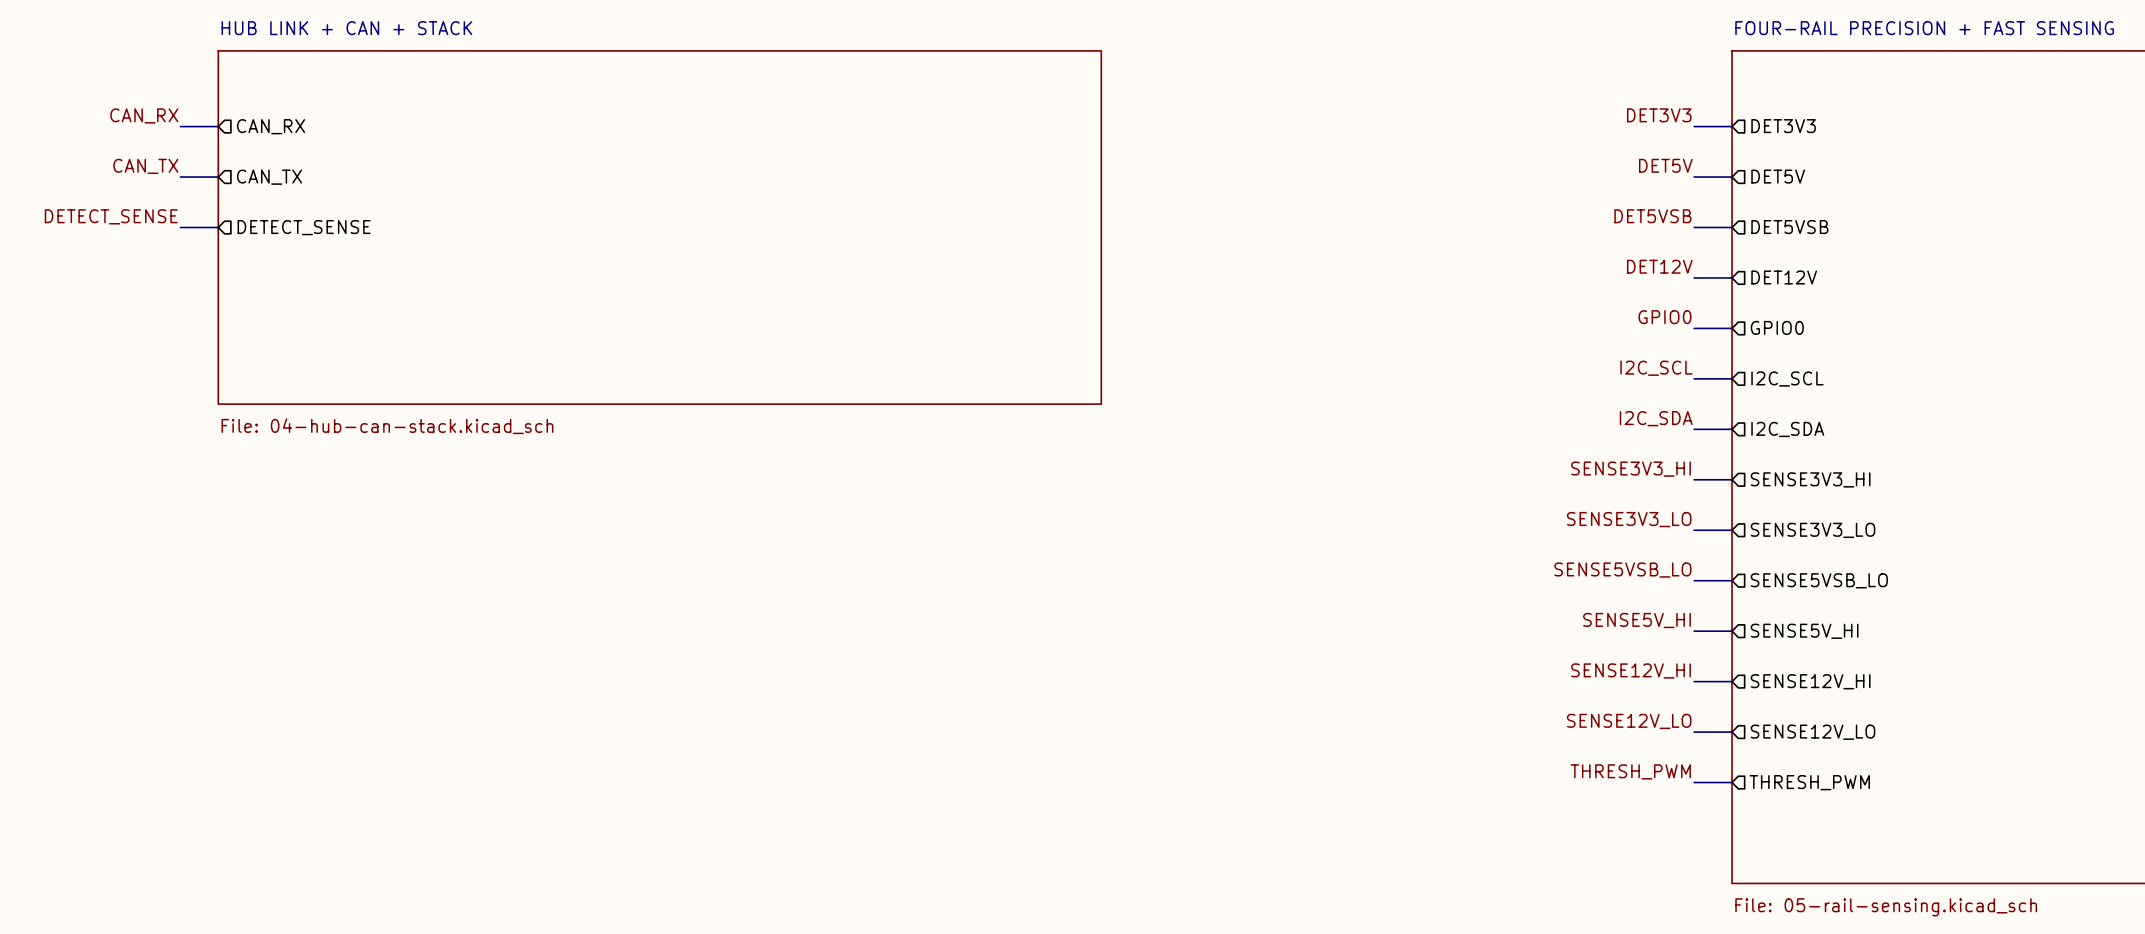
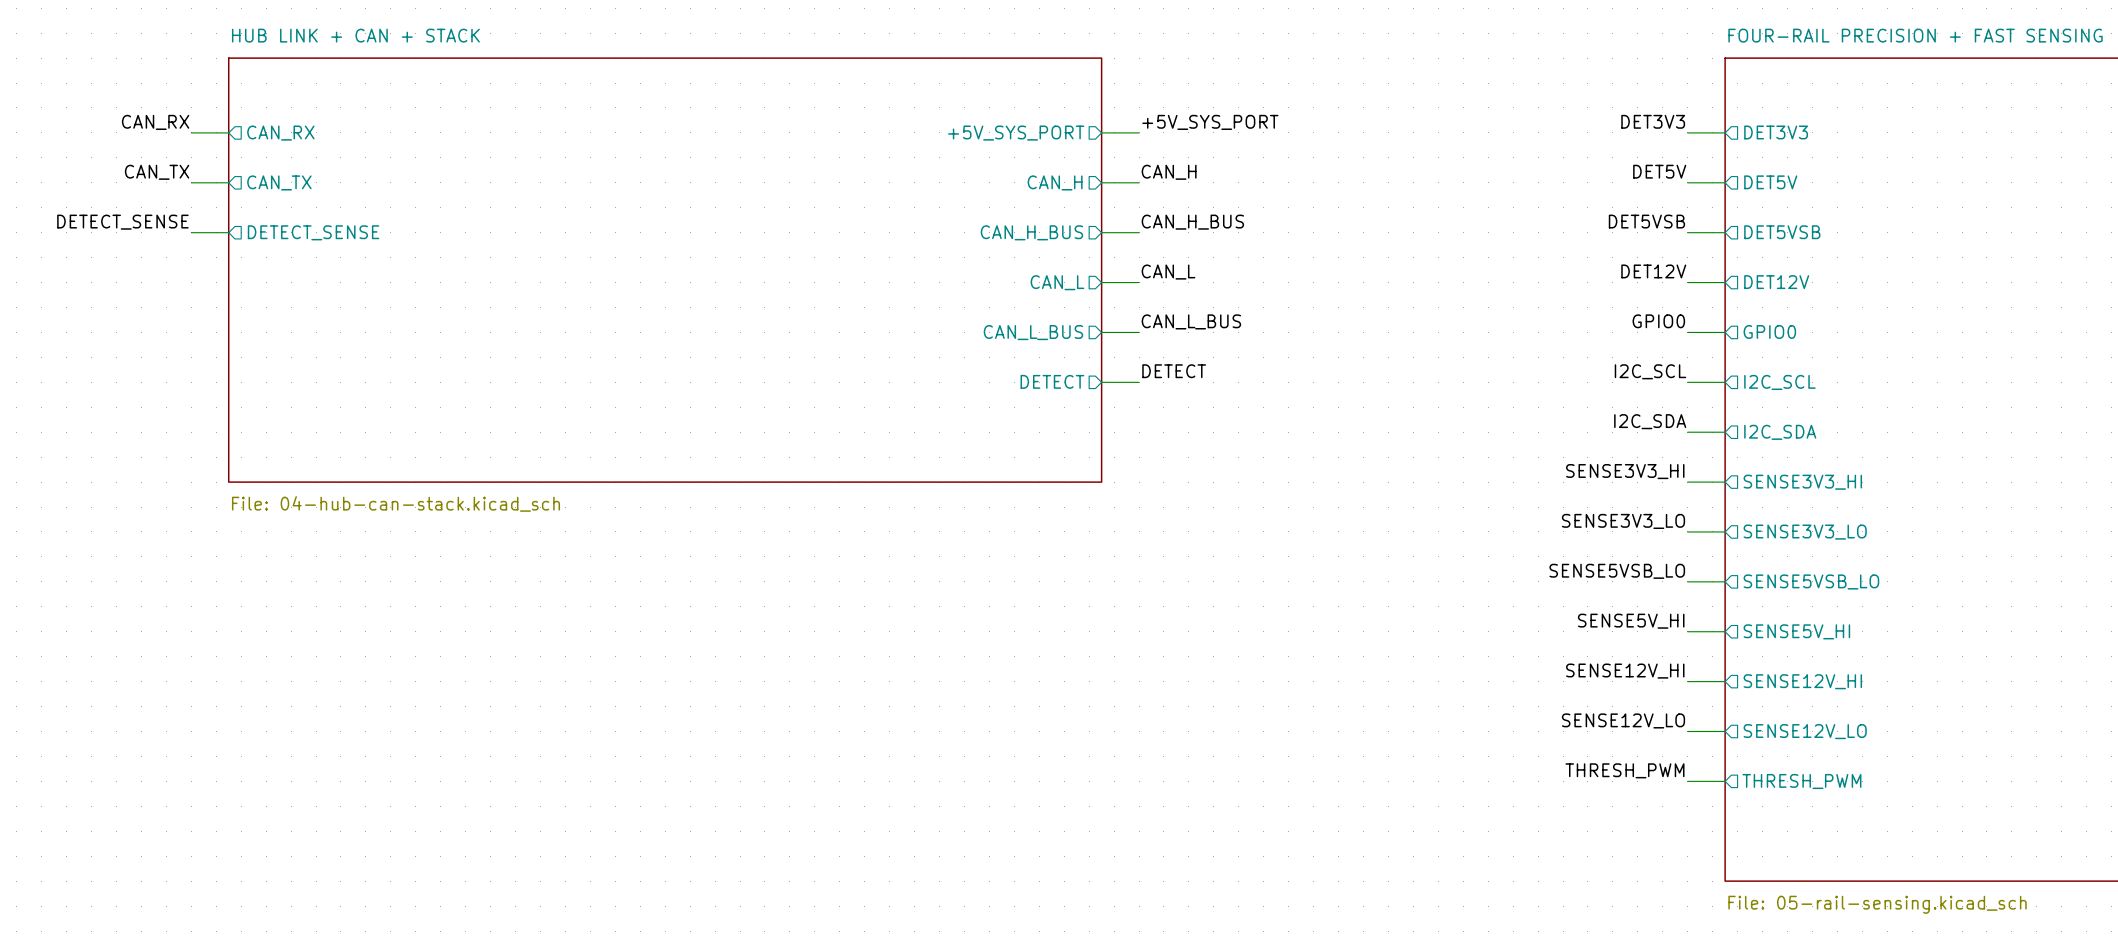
label: none -> +5V_SYS_PORT (1210, 122)
sheet pin: none -> +5V_SYS_PORT (1016, 133)
wire: none -> (1101, 132) (1139, 132)
label: none -> CAN_H (1169, 172)
sheet pin: none -> CAN_H (1055, 182)
wire: none -> (1101, 182) (1139, 182)
label: none -> CAN_H_BUS (1192, 222)
sheet HUB LINK + CAN + STACK: File: 04-hub-can-stack.kicad_sch (659, 227) -> none
sheet pin: none -> CAN_H_BUS (1031, 232)
wire: none -> (1101, 232) (1139, 232)
sheet HUB LINK + CAN + STACK: none -> File: 04-hub-can-stack.kicad_sch (665, 270)
label: none -> CAN_L (1168, 272)
wire: none -> (1101, 282) (1139, 282)
sheet pin: none -> CAN_L (1057, 282)
label: none -> CAN_L_BUS (1191, 321)
sheet pin: none -> CAN_L_BUS (1033, 332)
wire: none -> (1101, 332) (1139, 332)
label: none -> DETECT (1174, 371)
sheet pin: none -> DETECT (1052, 381)
wire: none -> (1101, 382) (1139, 382)

